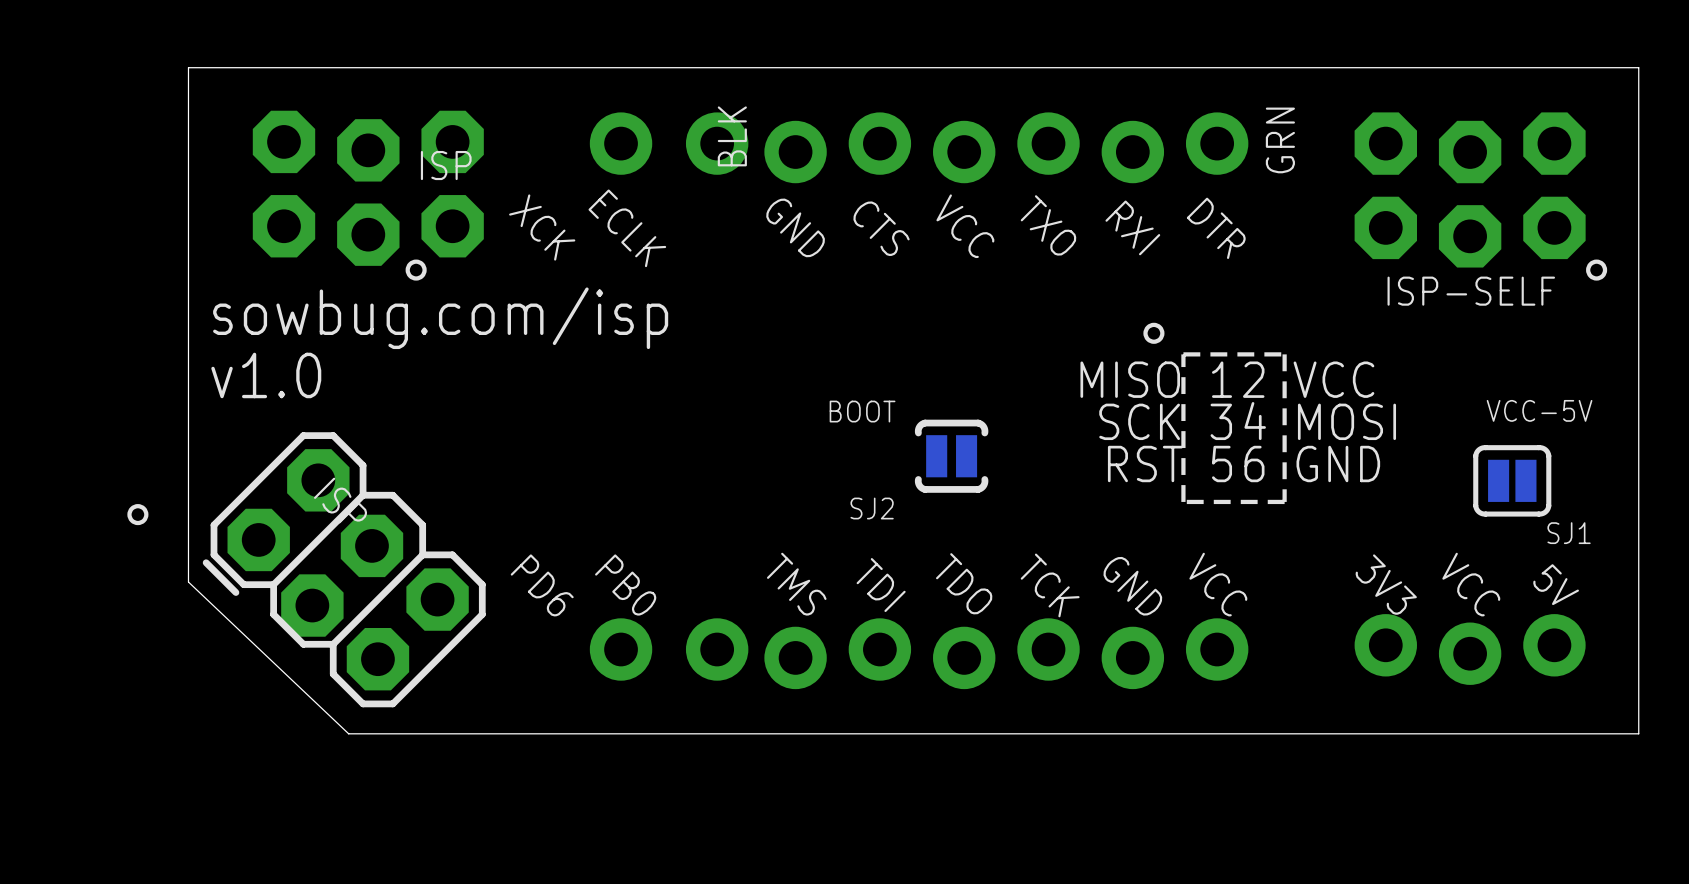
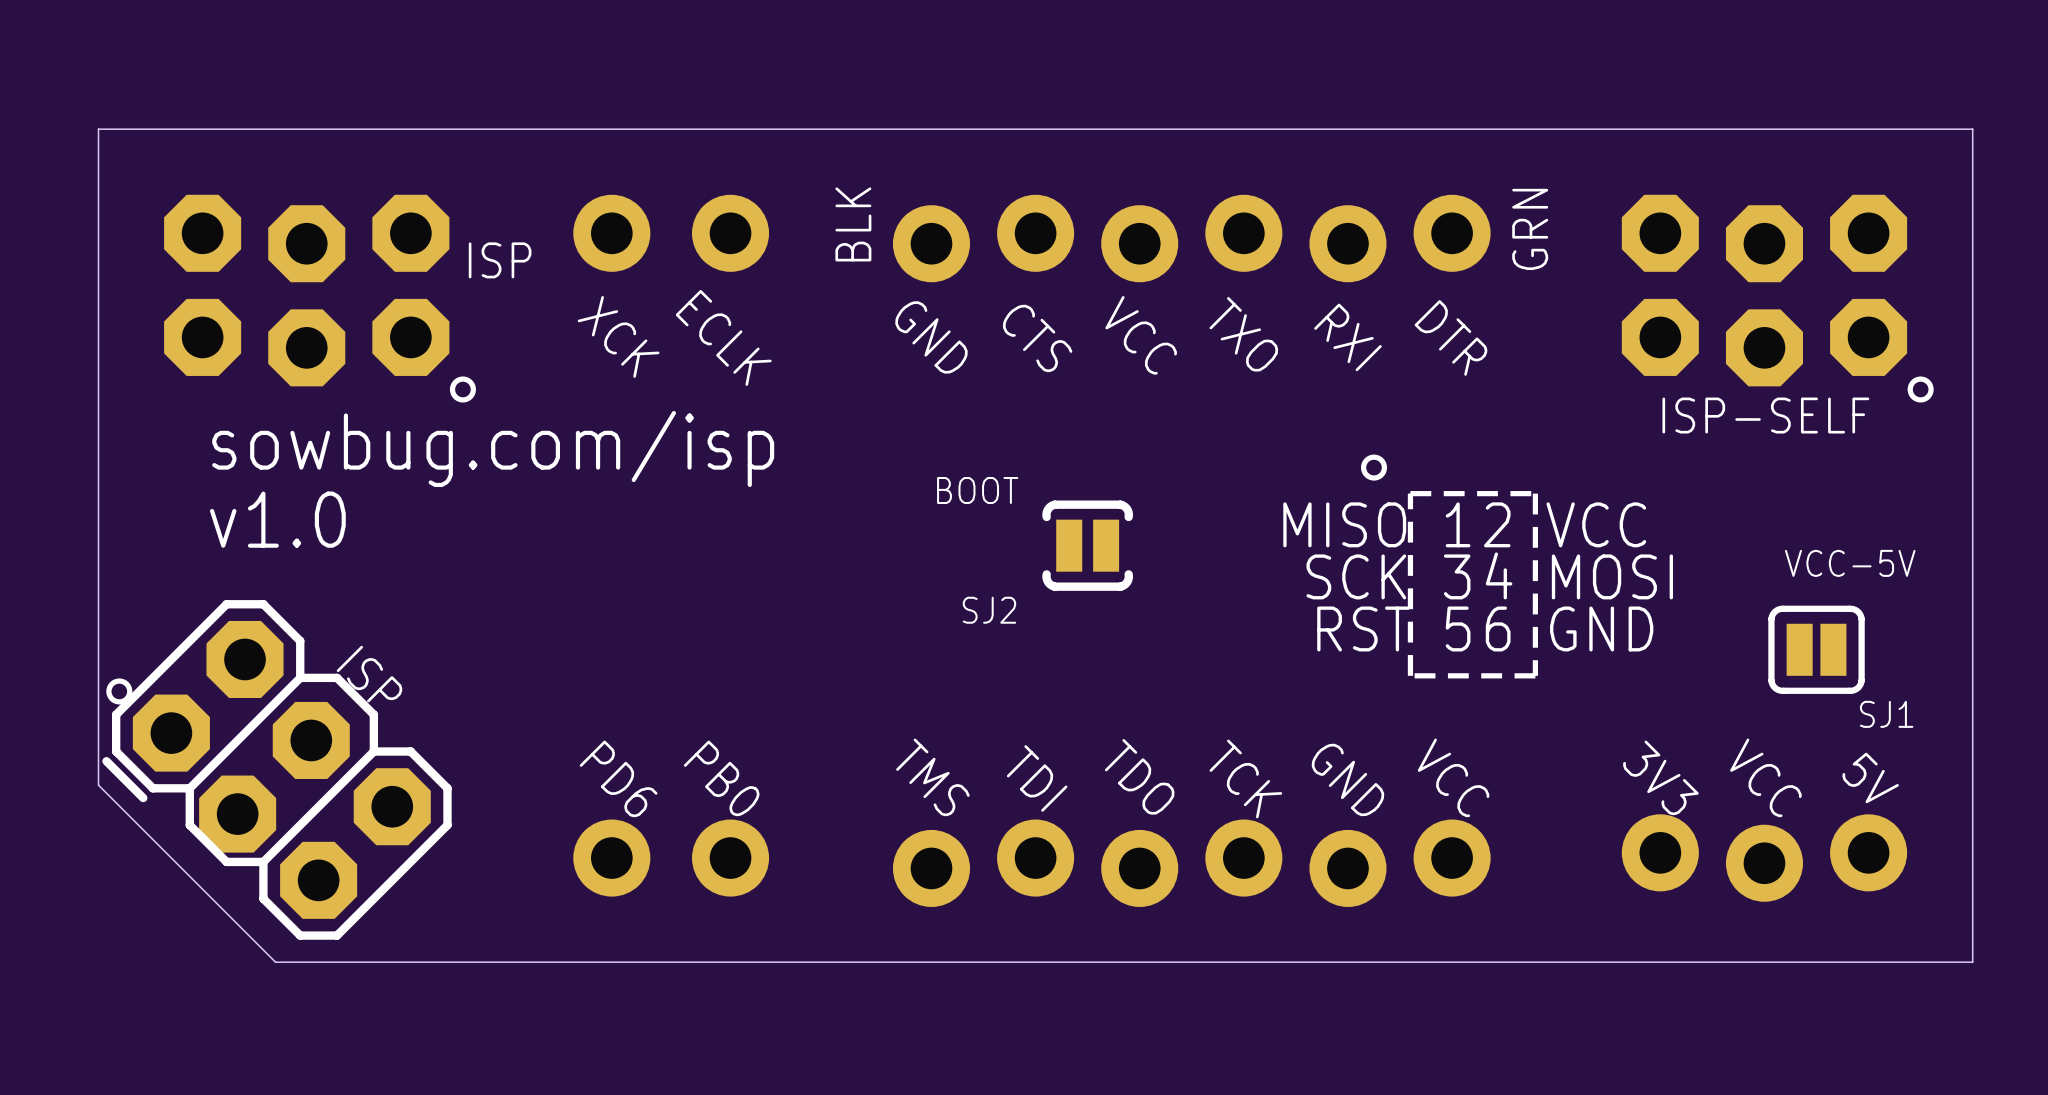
board edge: (1638, 67) (188, 67) (188, 582) (348, 733) -> (1972, 139) (1972, 129) (98, 129) (98, 785) (275, 962) (379, 962)
part position: (669, 143) -> (671, 233)
part position: (368, 188) -> (306, 290)
SJ2 position: (951, 456) -> (1087, 545)
part position: (344, 569) -> (276, 769)
part position: (669, 649) -> (671, 858)

